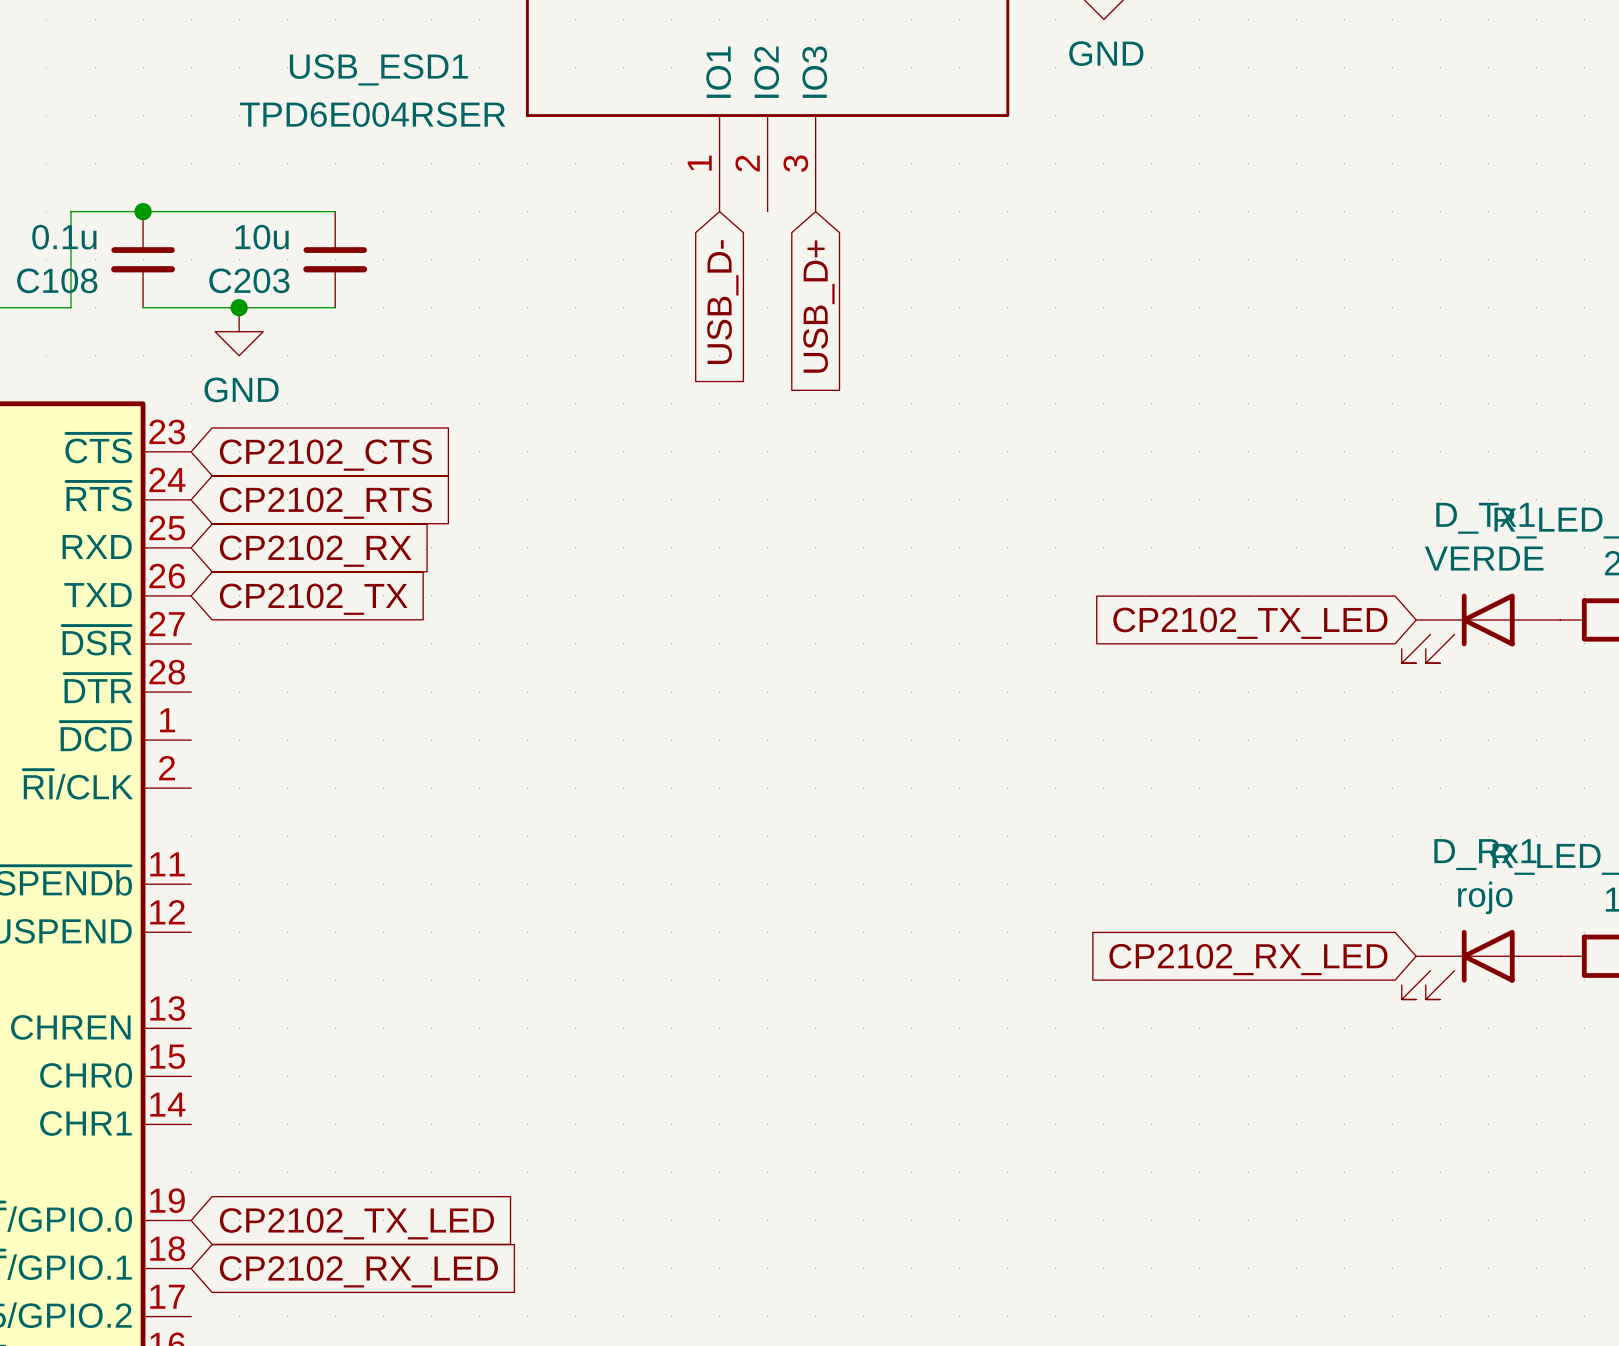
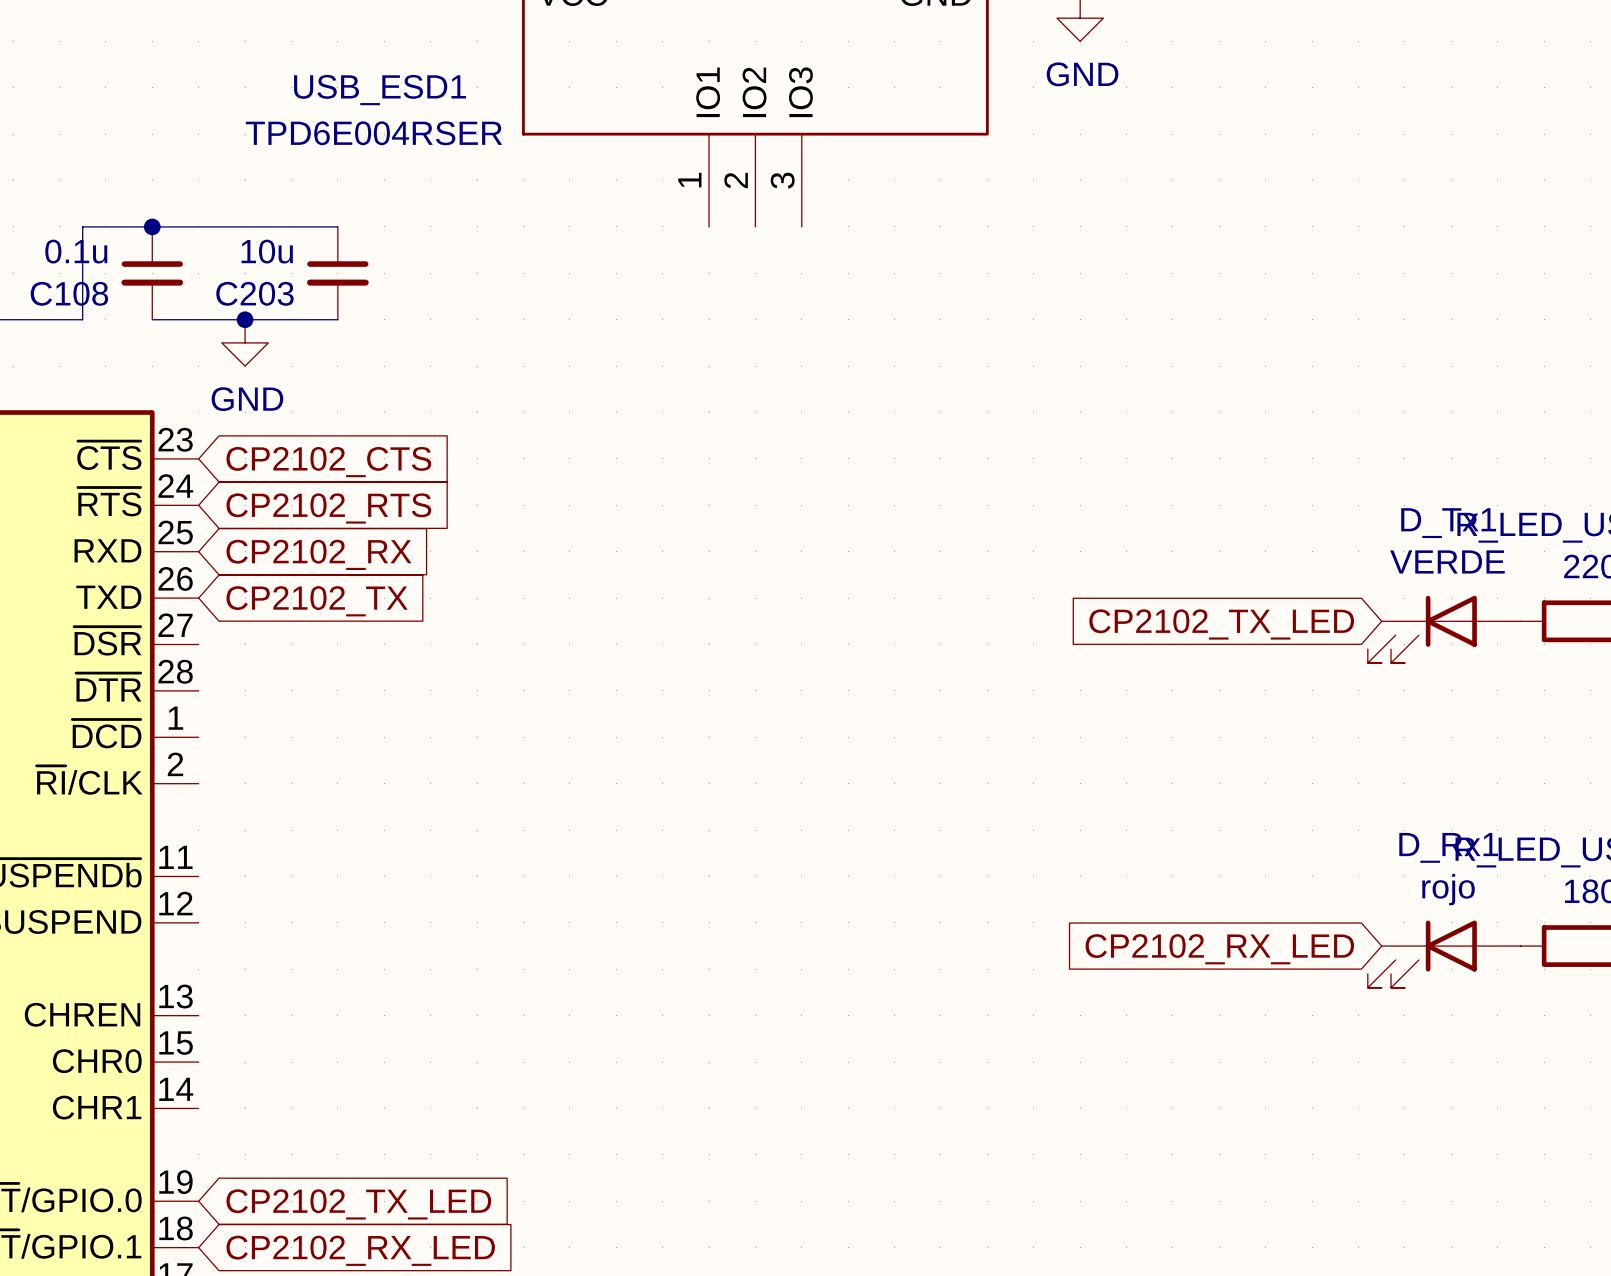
global label: USB_D- (722, 302) -> none
global label: USB_D+ (818, 306) -> none

